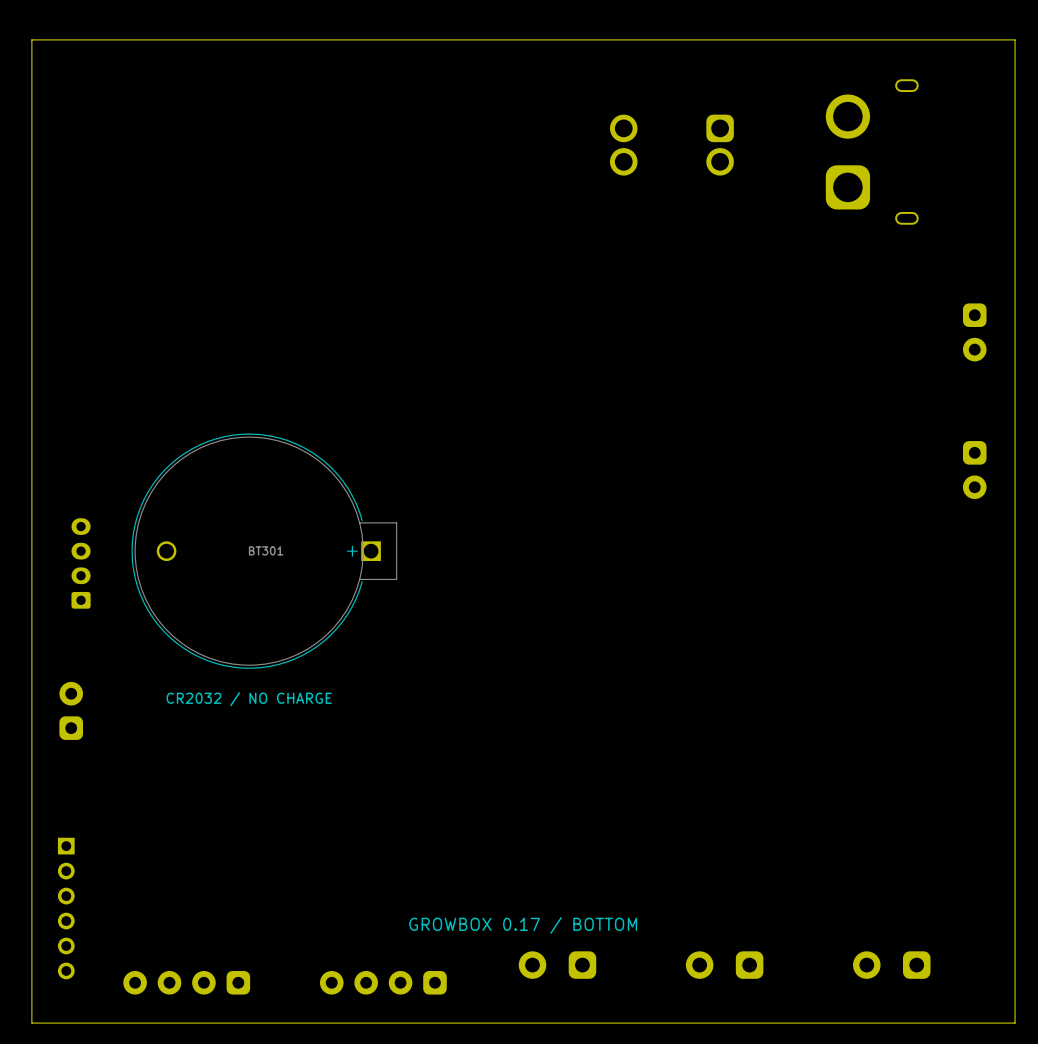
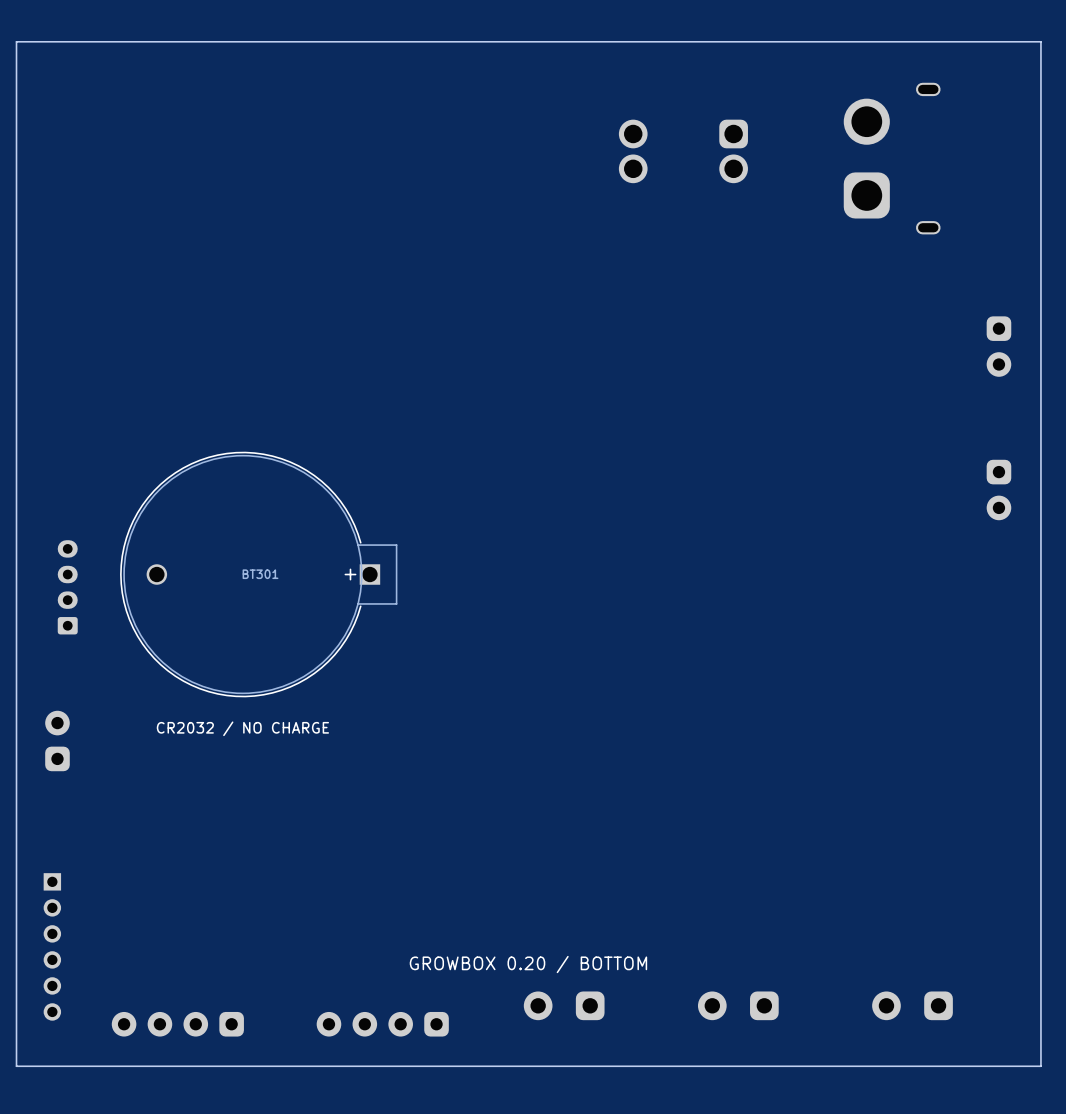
text: GROWBOX 0.17 / BOTTOM (523, 925) -> GROWBOX 0.20 / BOTTOM (528, 964)

